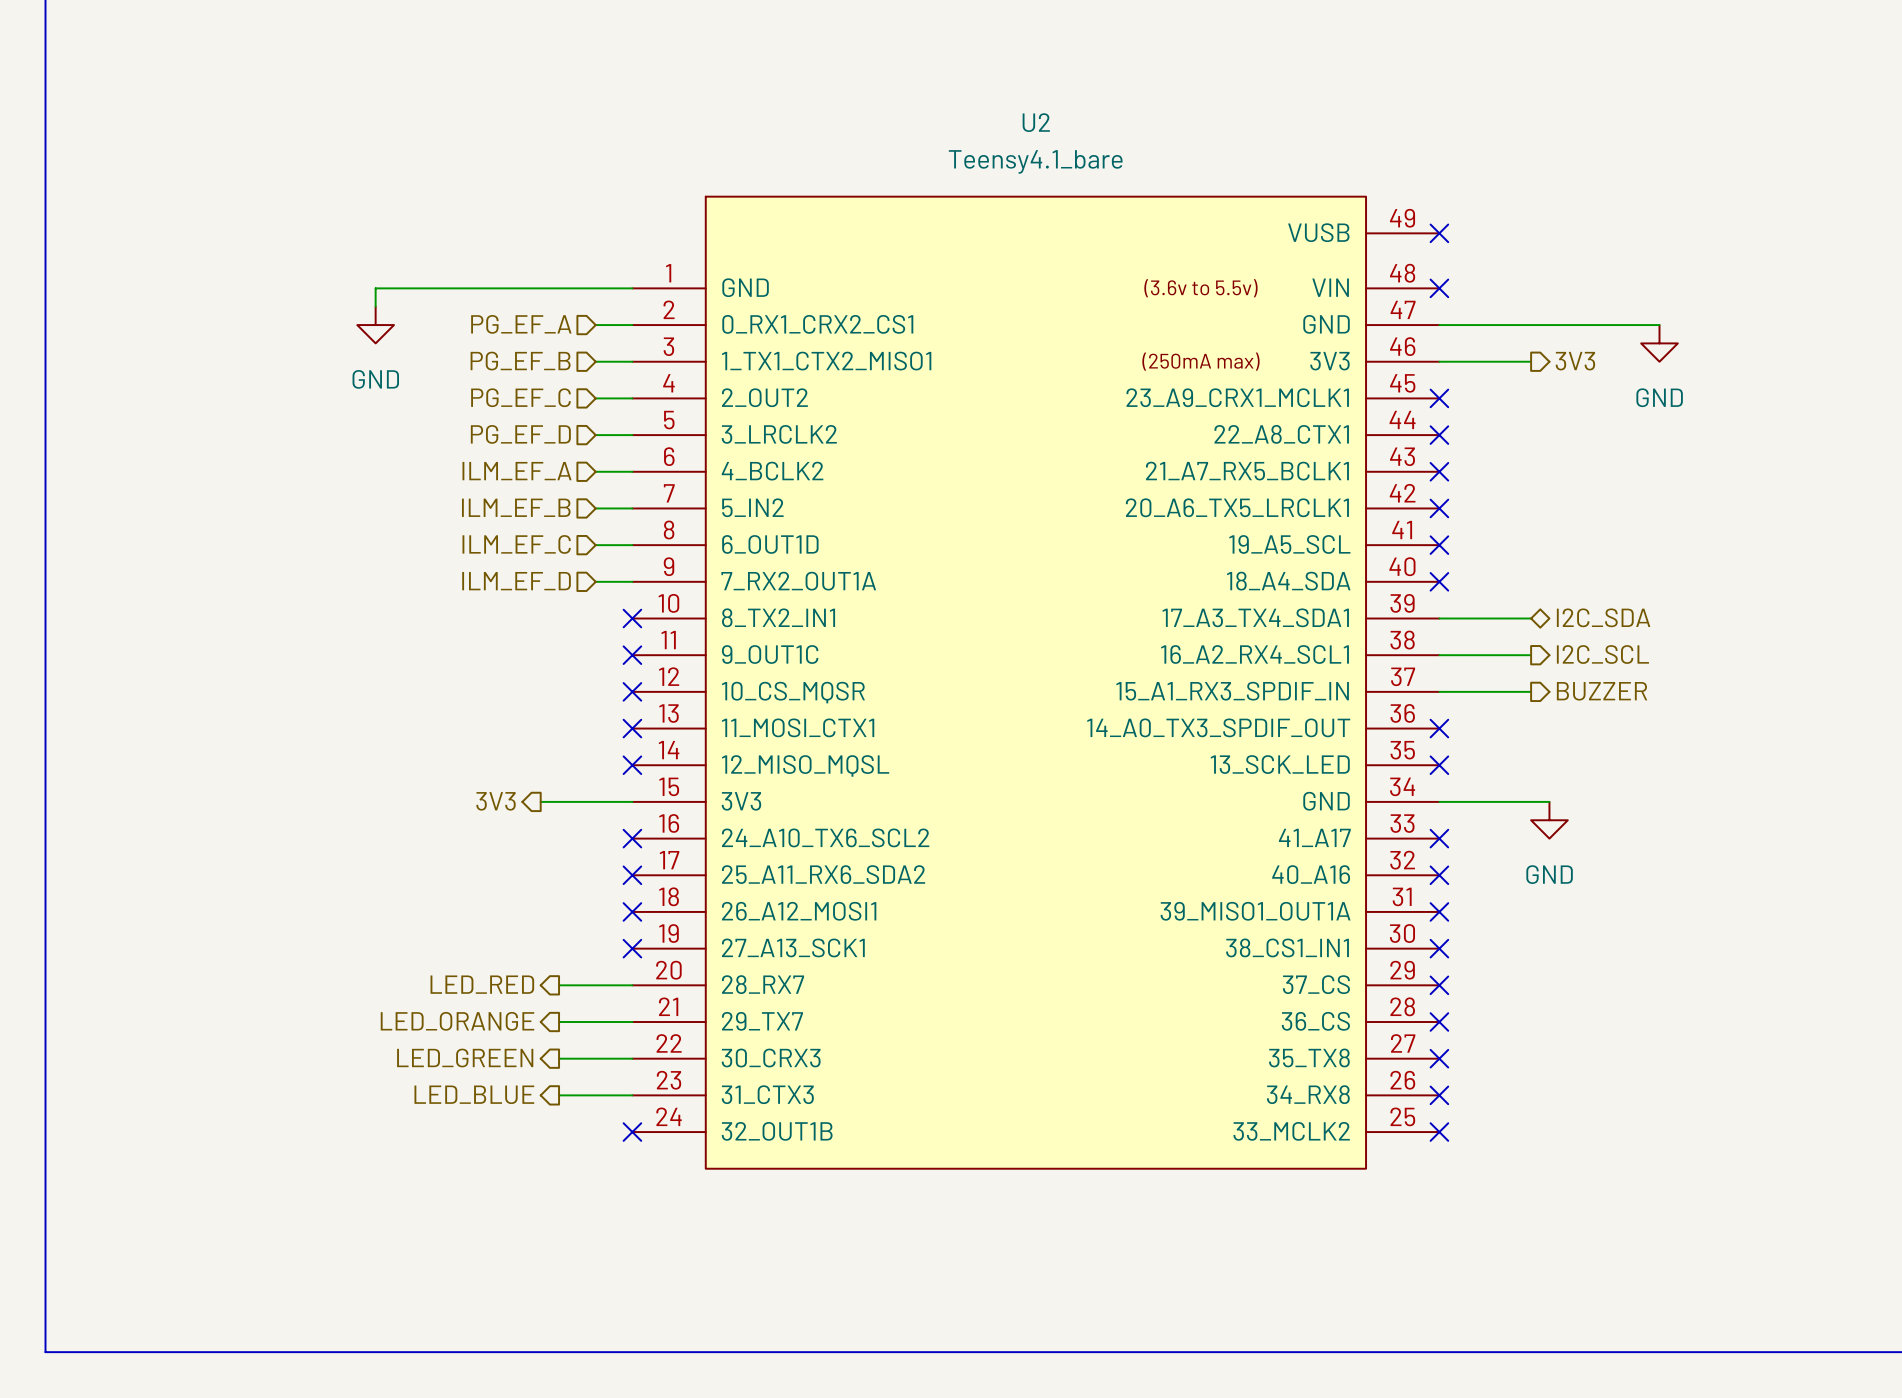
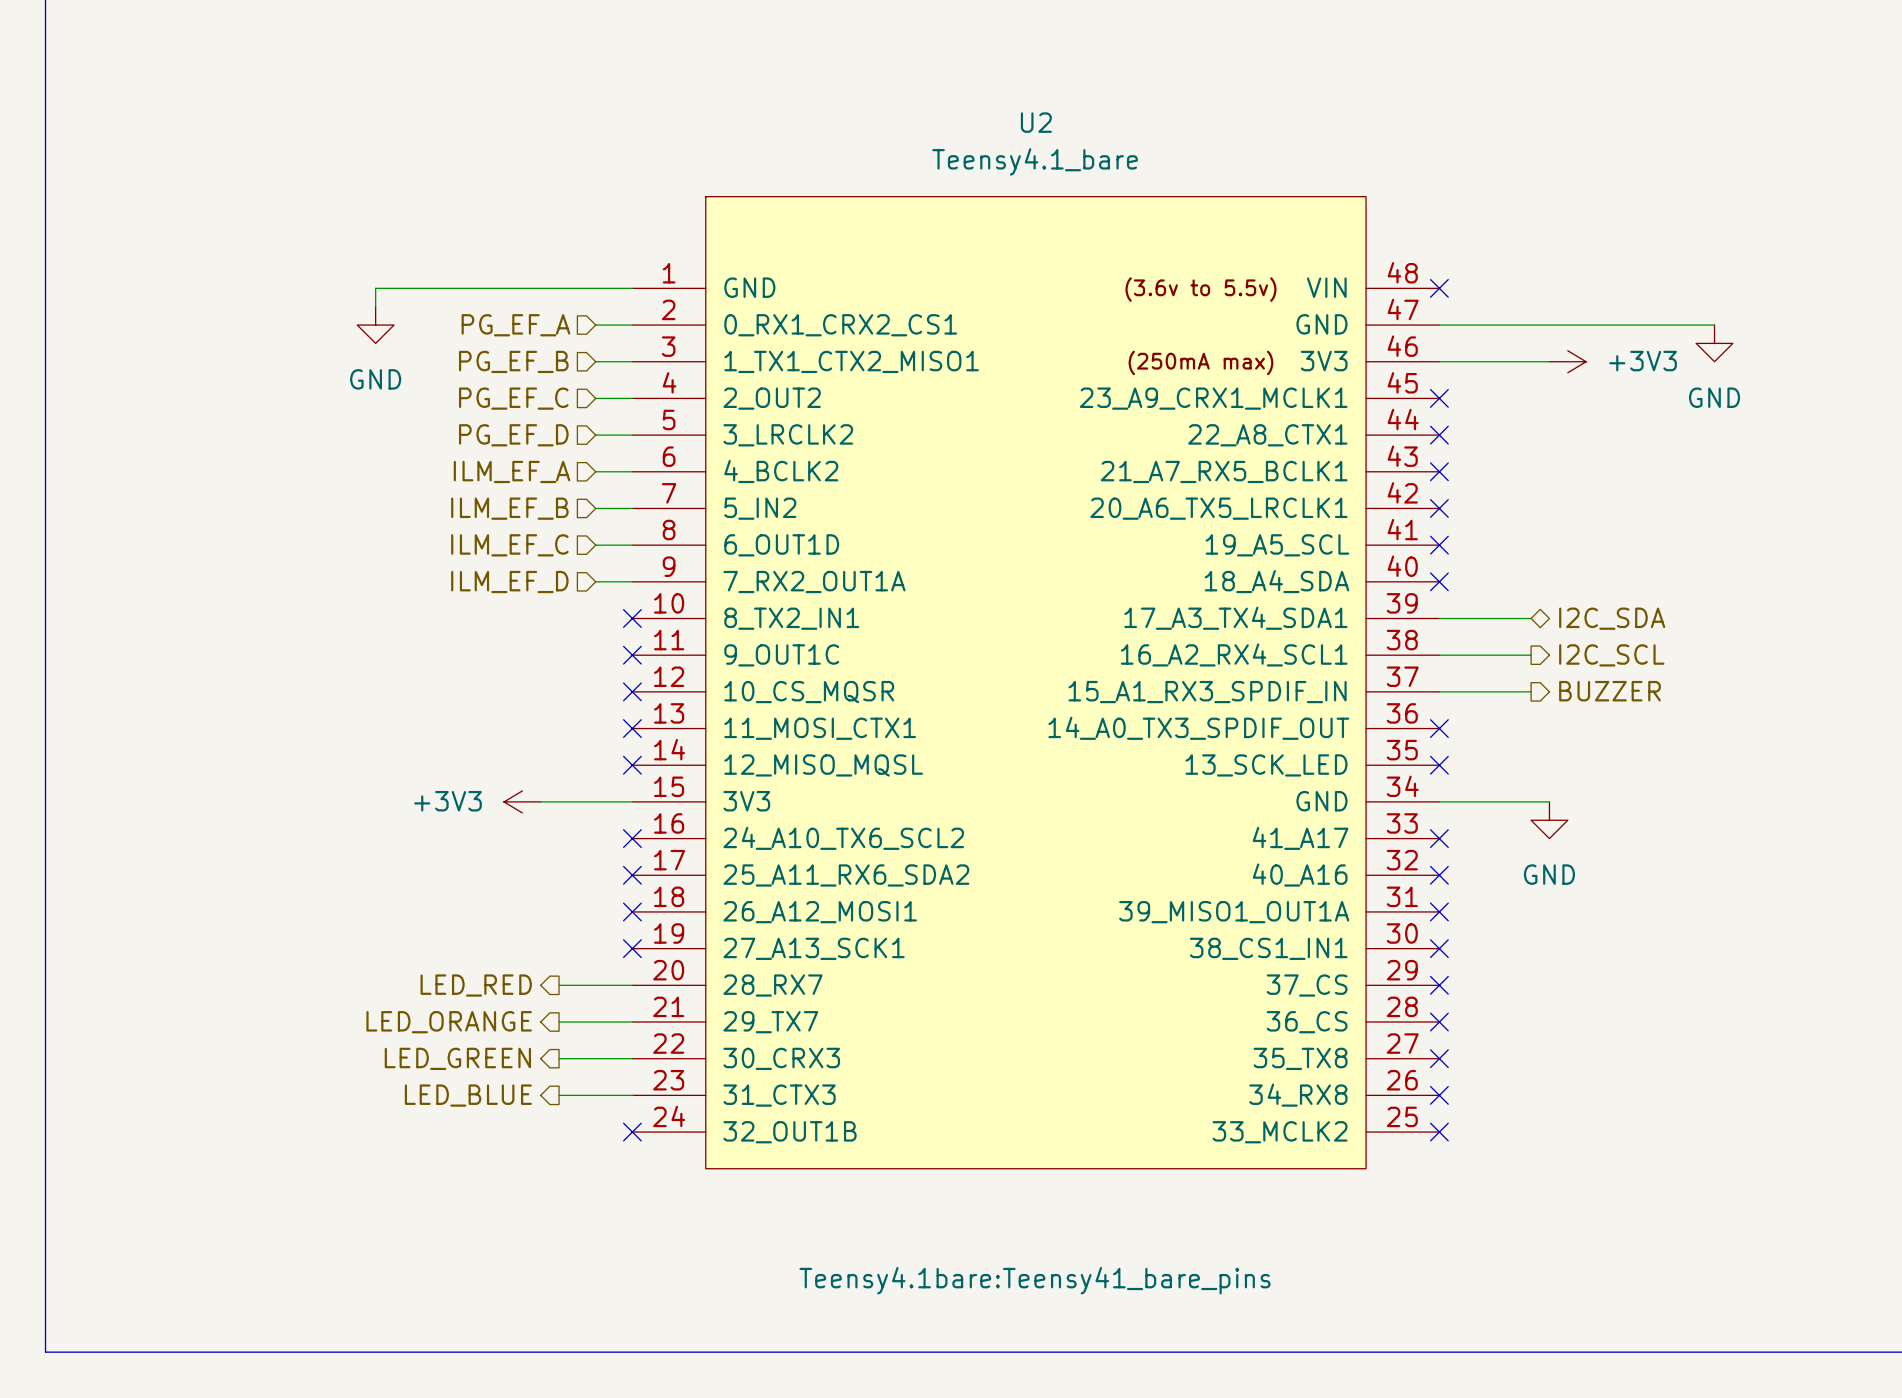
U2 symbol: [632, 196, 1440, 1169] -> [632, 196, 1440, 1169]
no-connect mark: (1439, 233) -> none
wire: none -> (1659, 325) (1714, 325)
power symbol position: GND (1659, 343) -> GND (1714, 343)
wire: none -> (1531, 361) (1549, 361)
power symbol: none -> +3V3 (1567, 361)
hierarchical label: 3V3 (1575, 361) -> none
hierarchical label: 3V3 (496, 801) -> none
power symbol: none -> +3V3 (522, 801)
U2 text: none -> Teensy4.1bare:Teensy41_bare_pins (1035, 1280)

